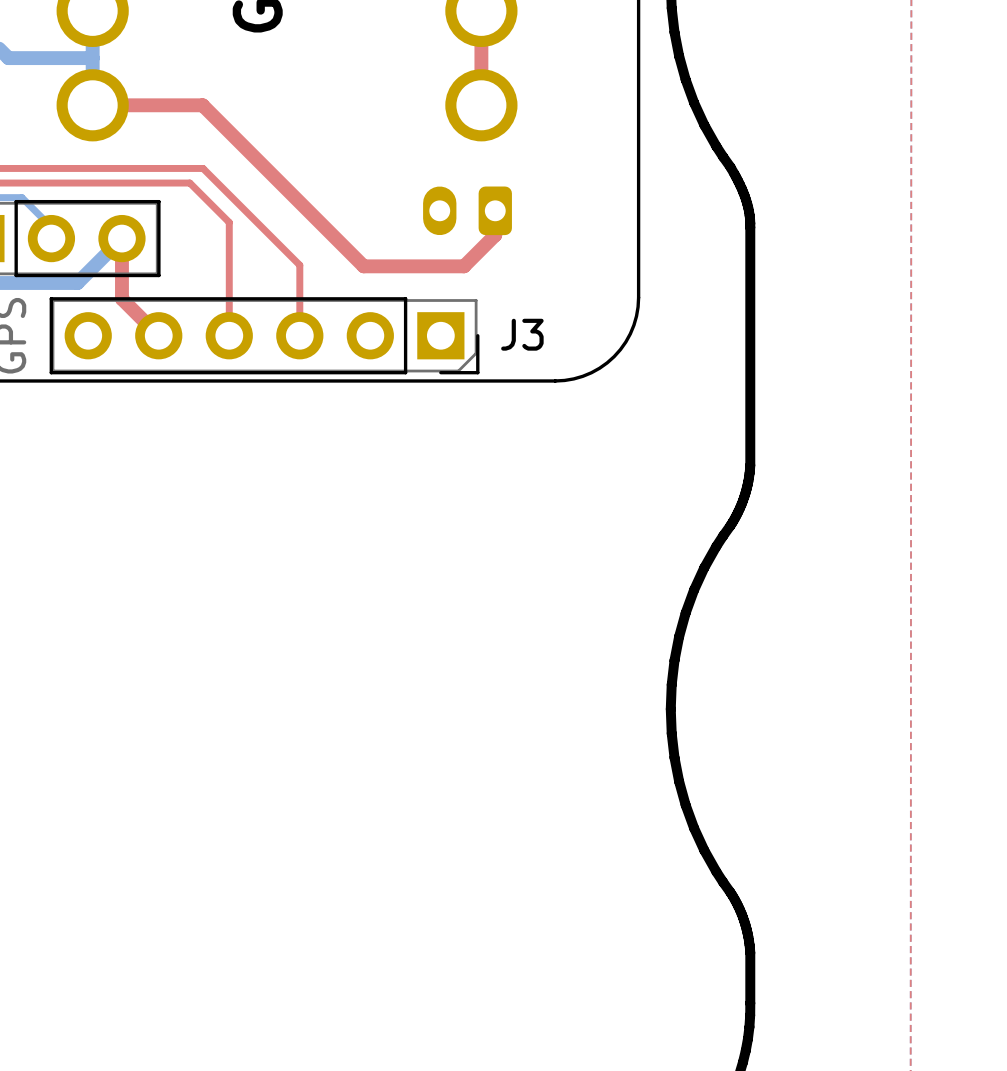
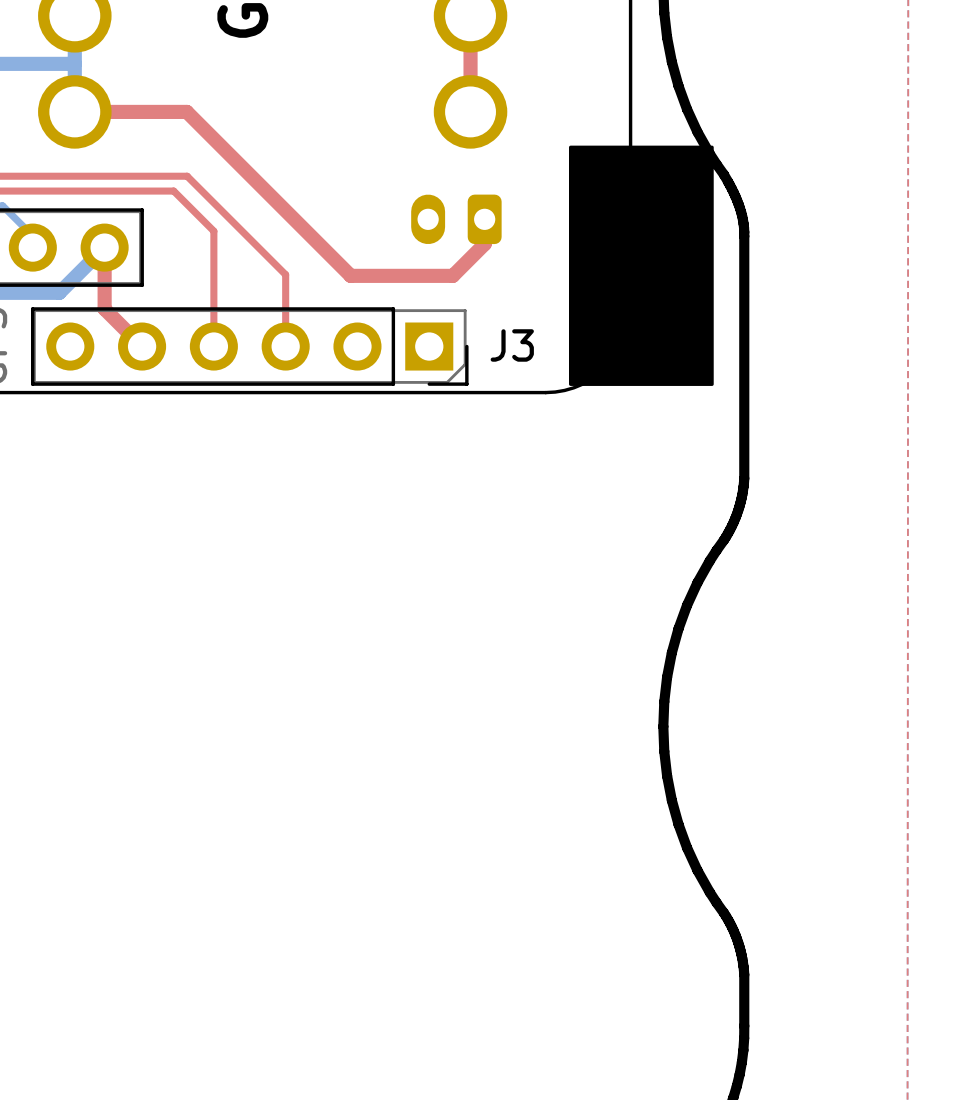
drawing: none -> [568, 145, 714, 386]

